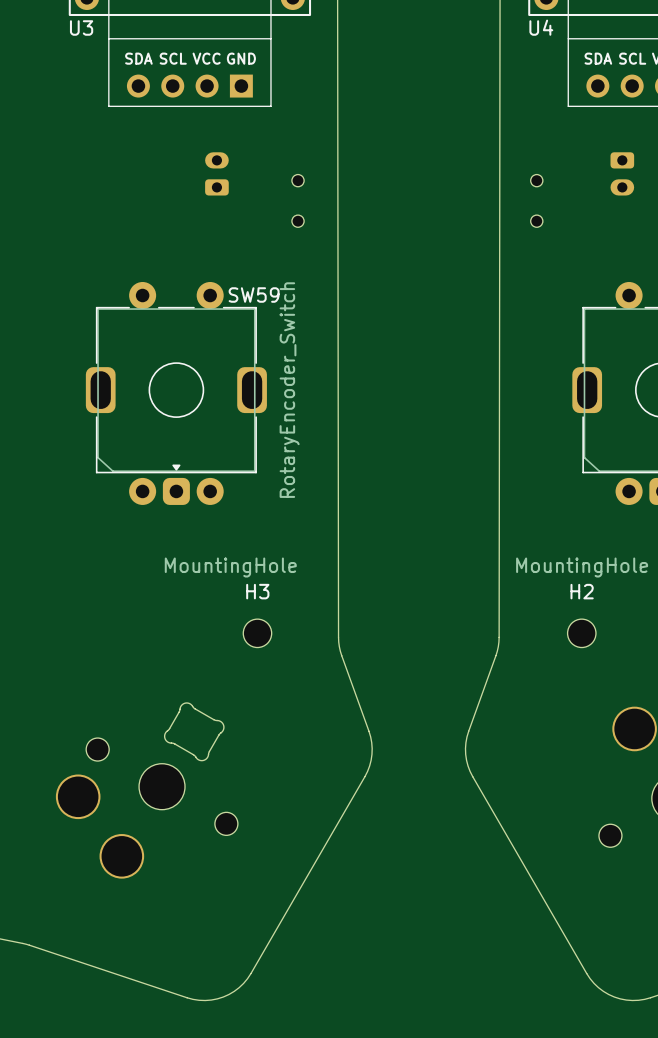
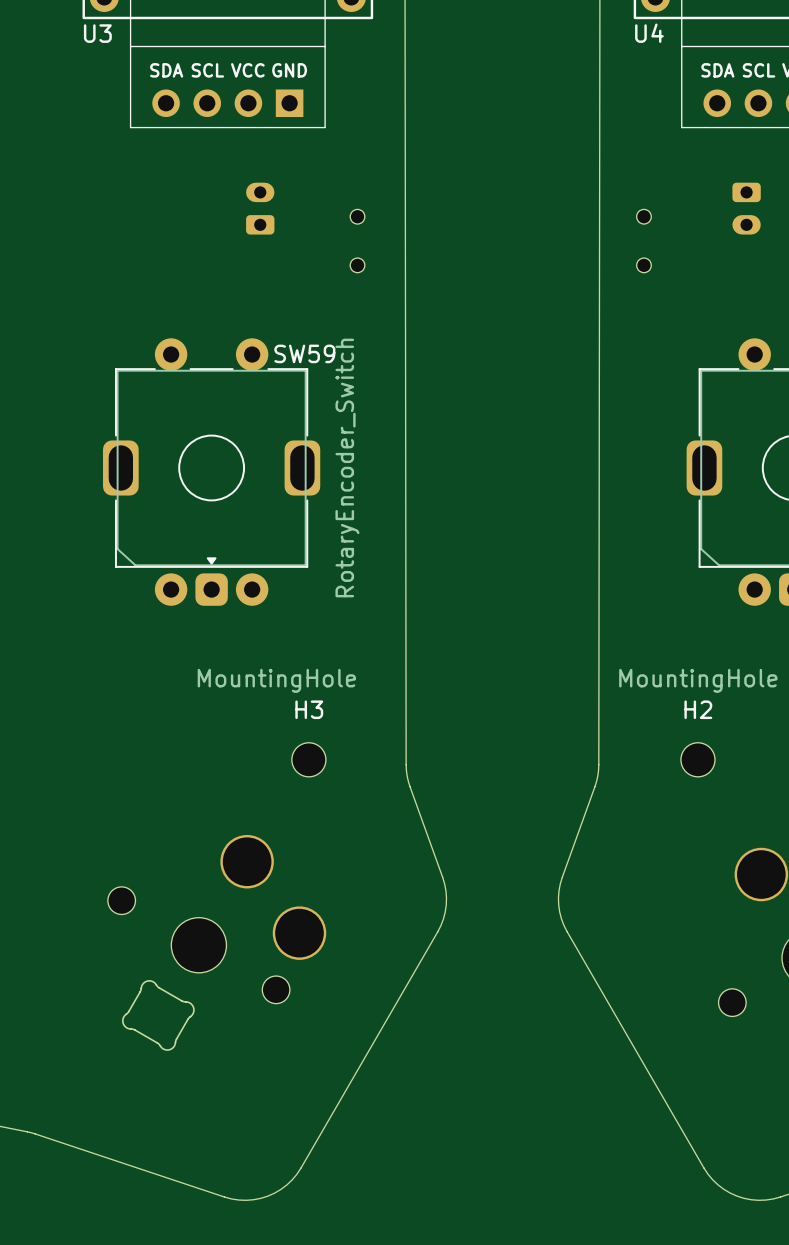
part position: (194, 731) -> (158, 1015)
part rotation: 0° (146, 808) -> 180° (217, 919)

